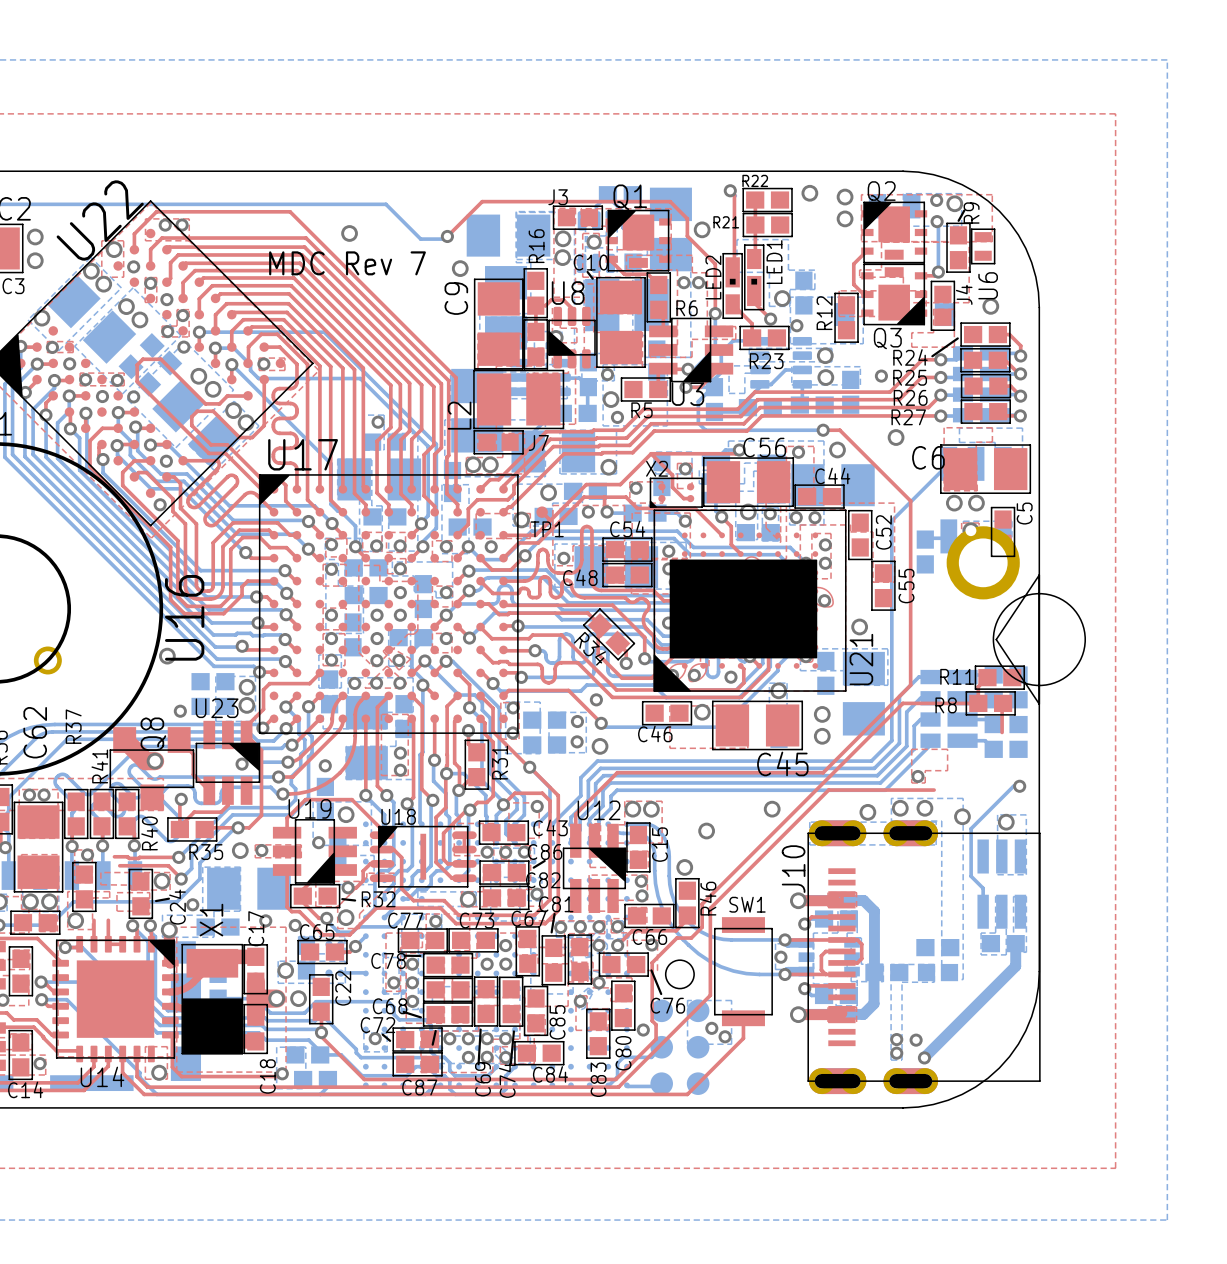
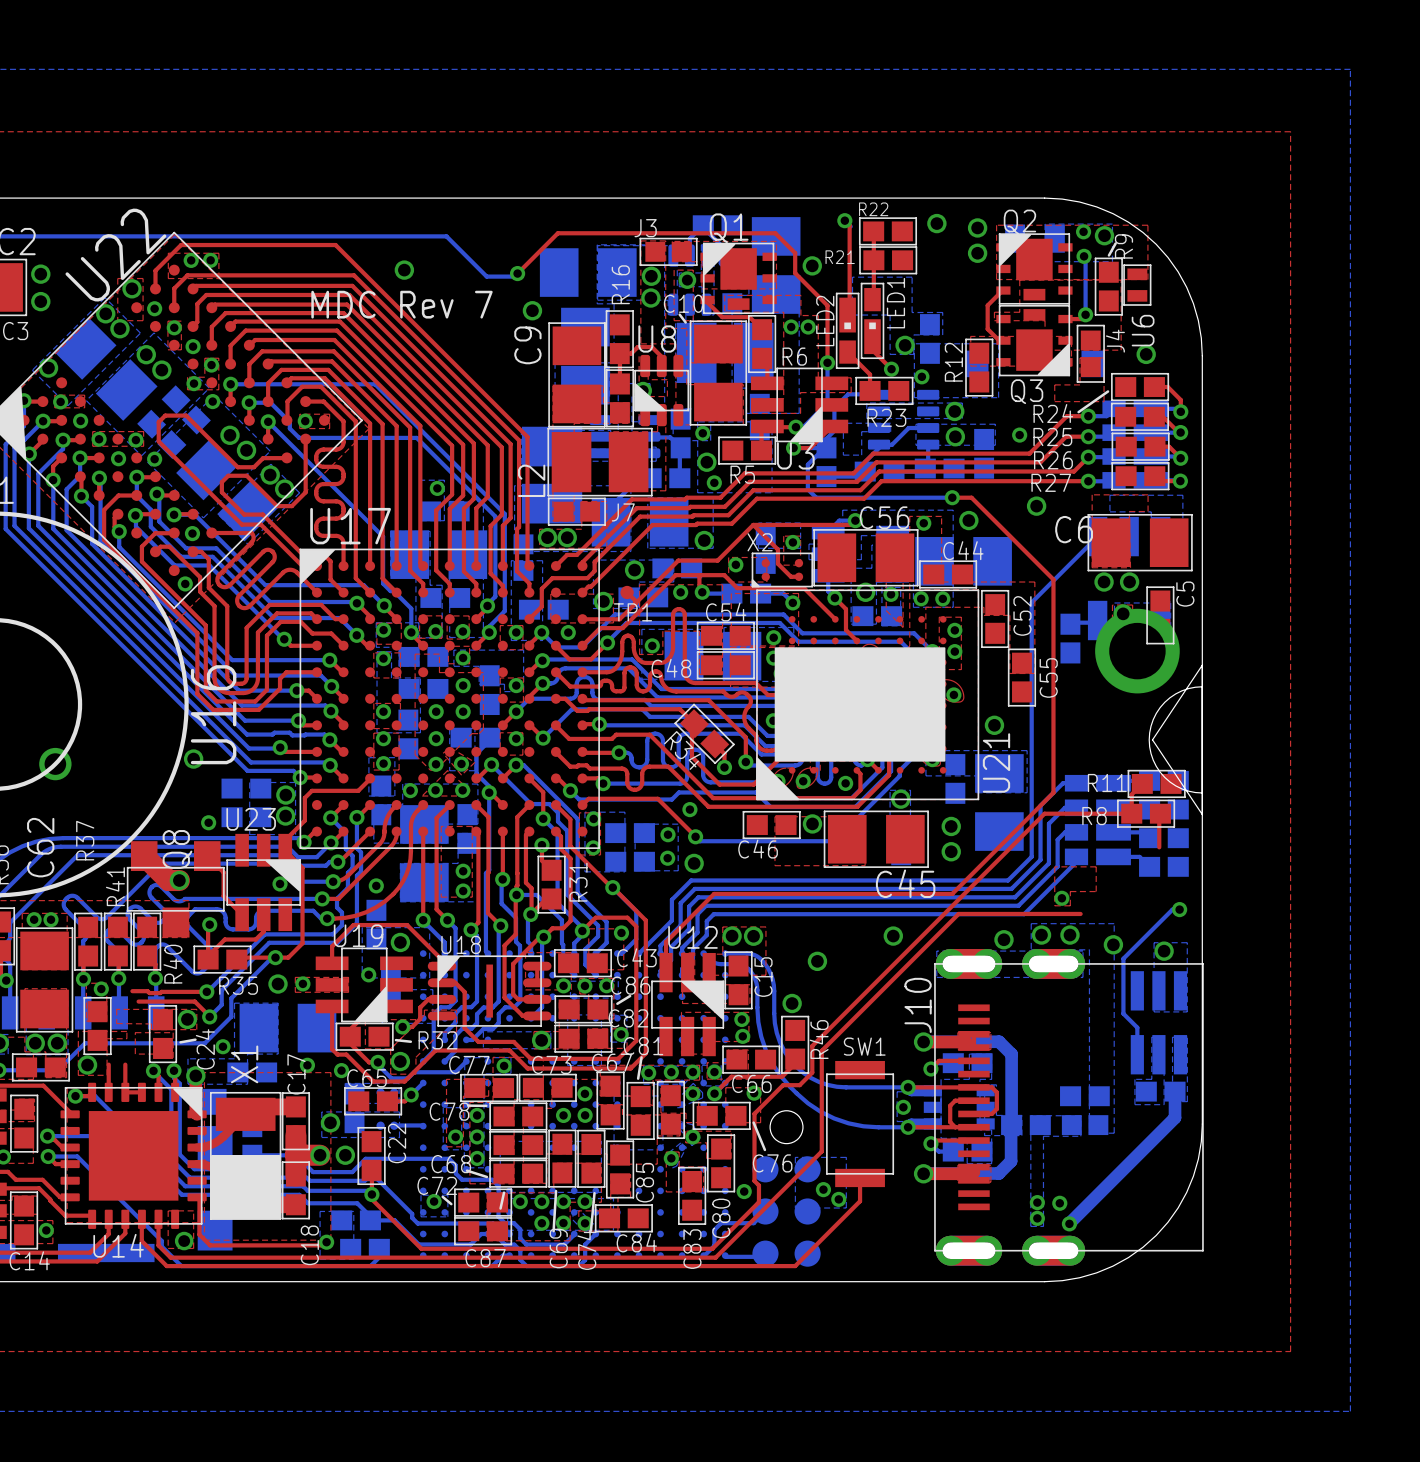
round board edge: [993, 593, 1086, 686] -> none
board edge: none -> (1202, 686) (1182, 690) (1164, 702) (1153, 719) (1149, 739) (1153, 760) (1164, 777) (1182, 788) (1202, 792)

